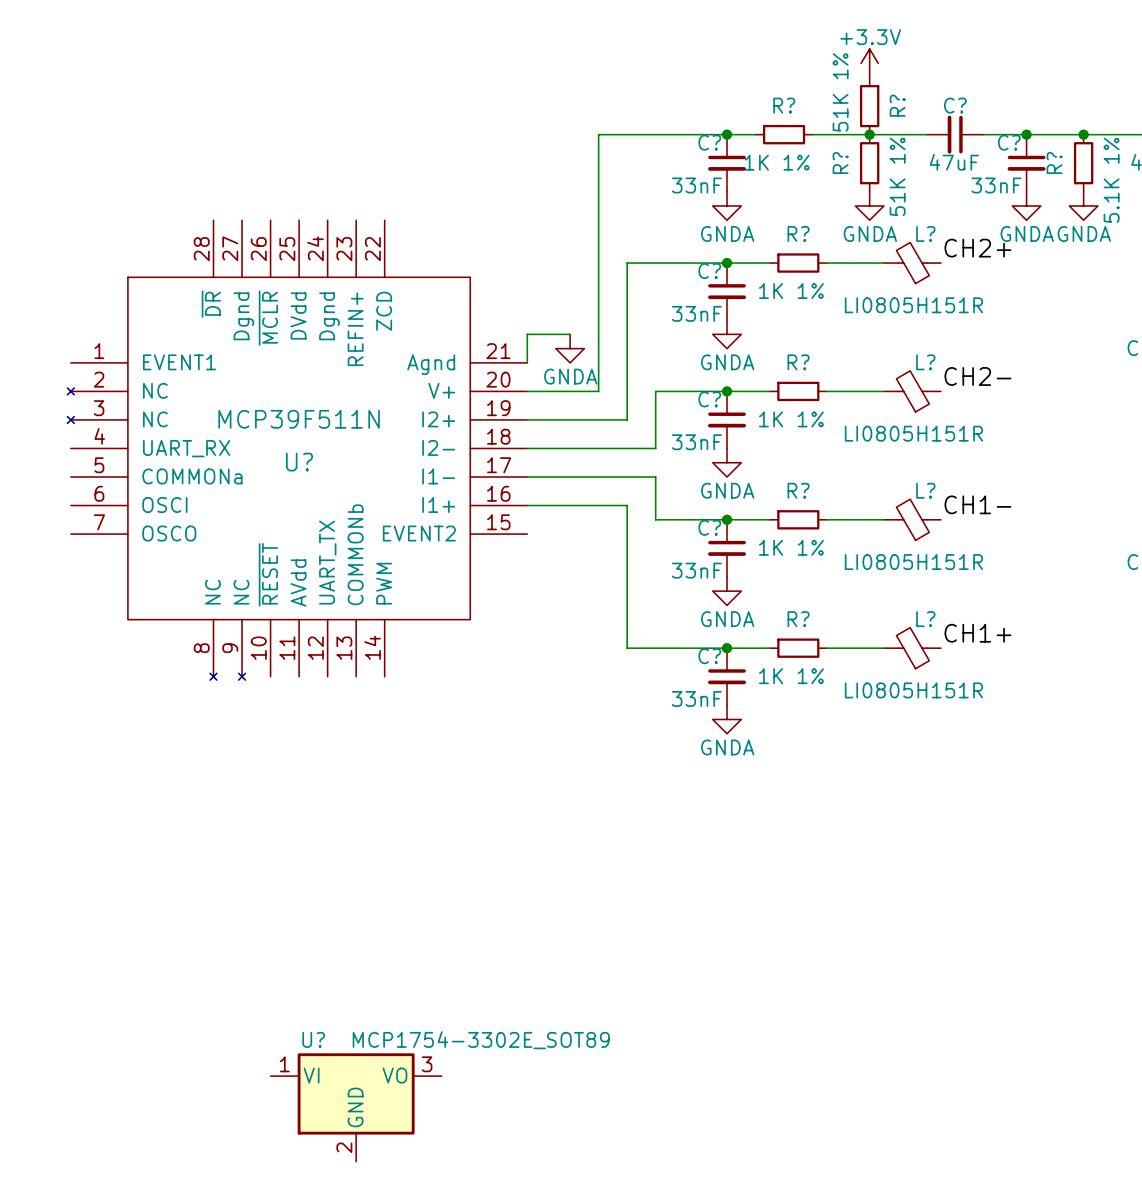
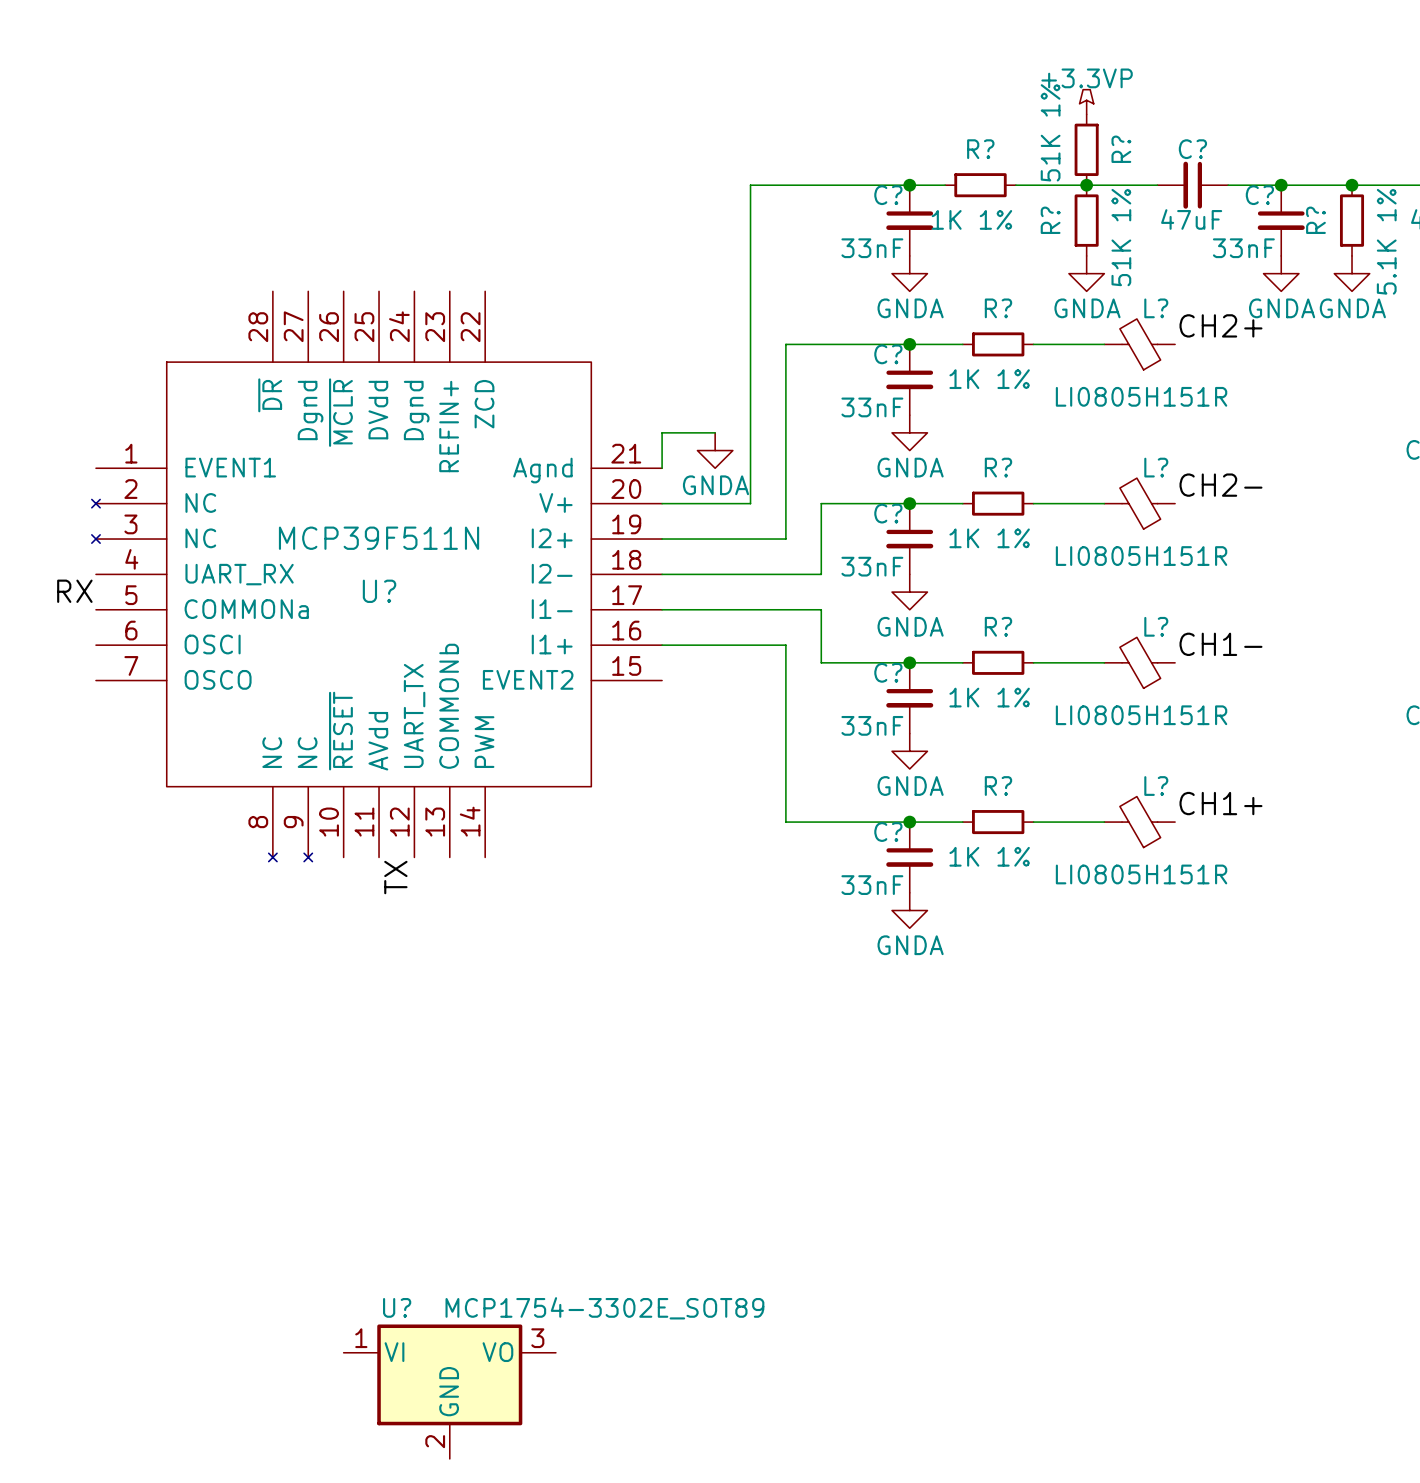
power symbol: +3.3V (869, 63) -> +3.3VP (1086, 102)
label: none -> RX (74, 591)
label: none -> TX (395, 877)

